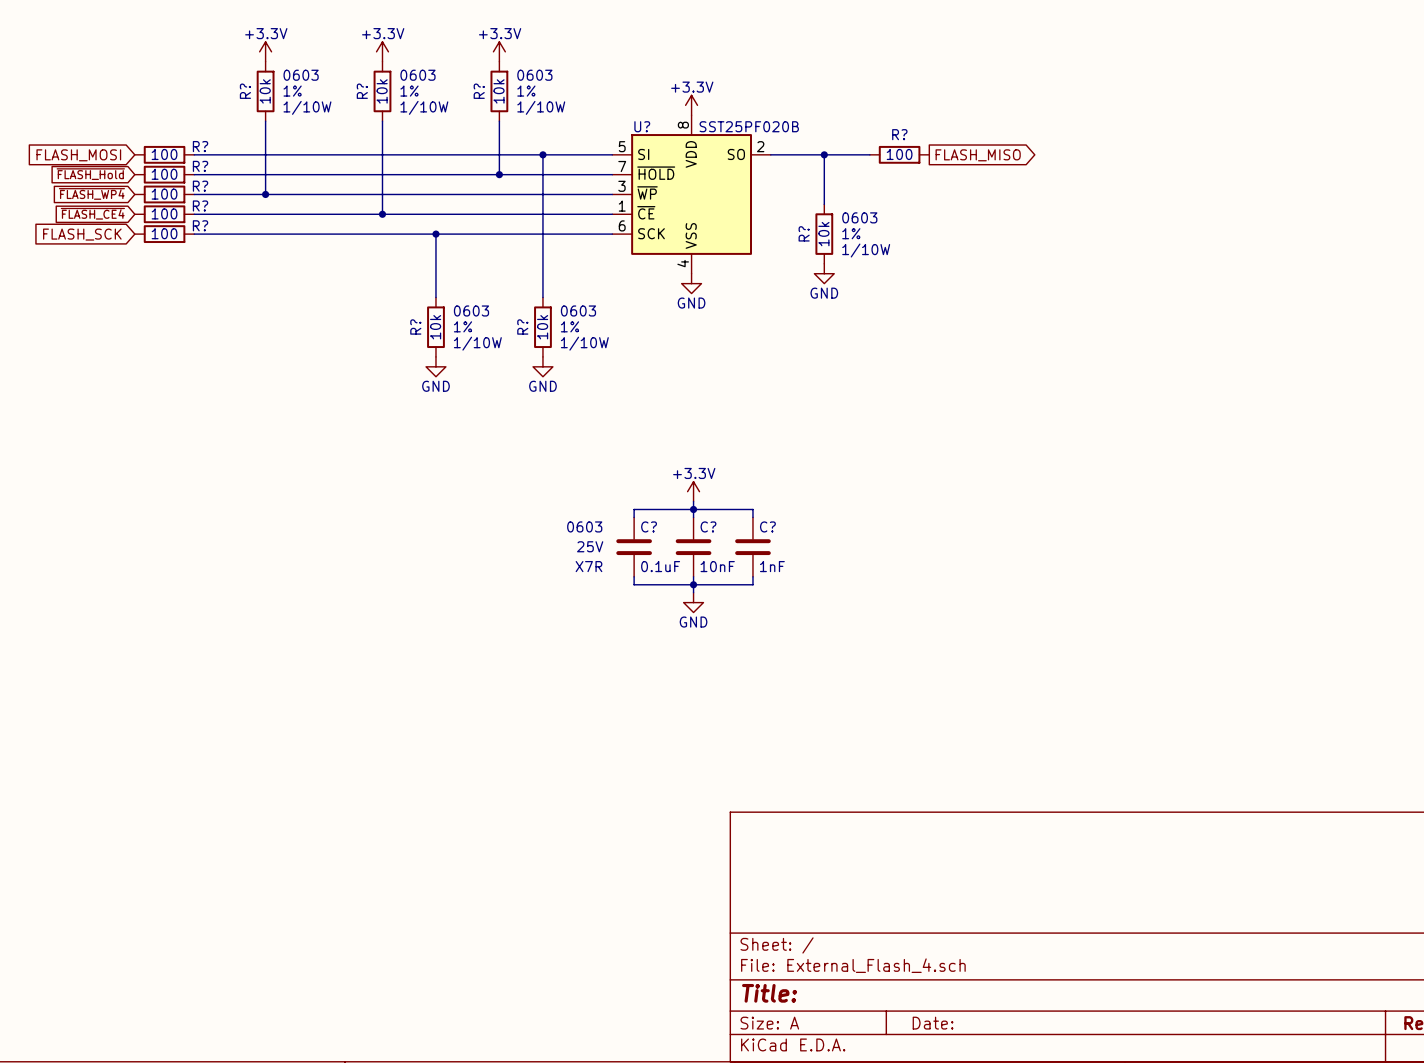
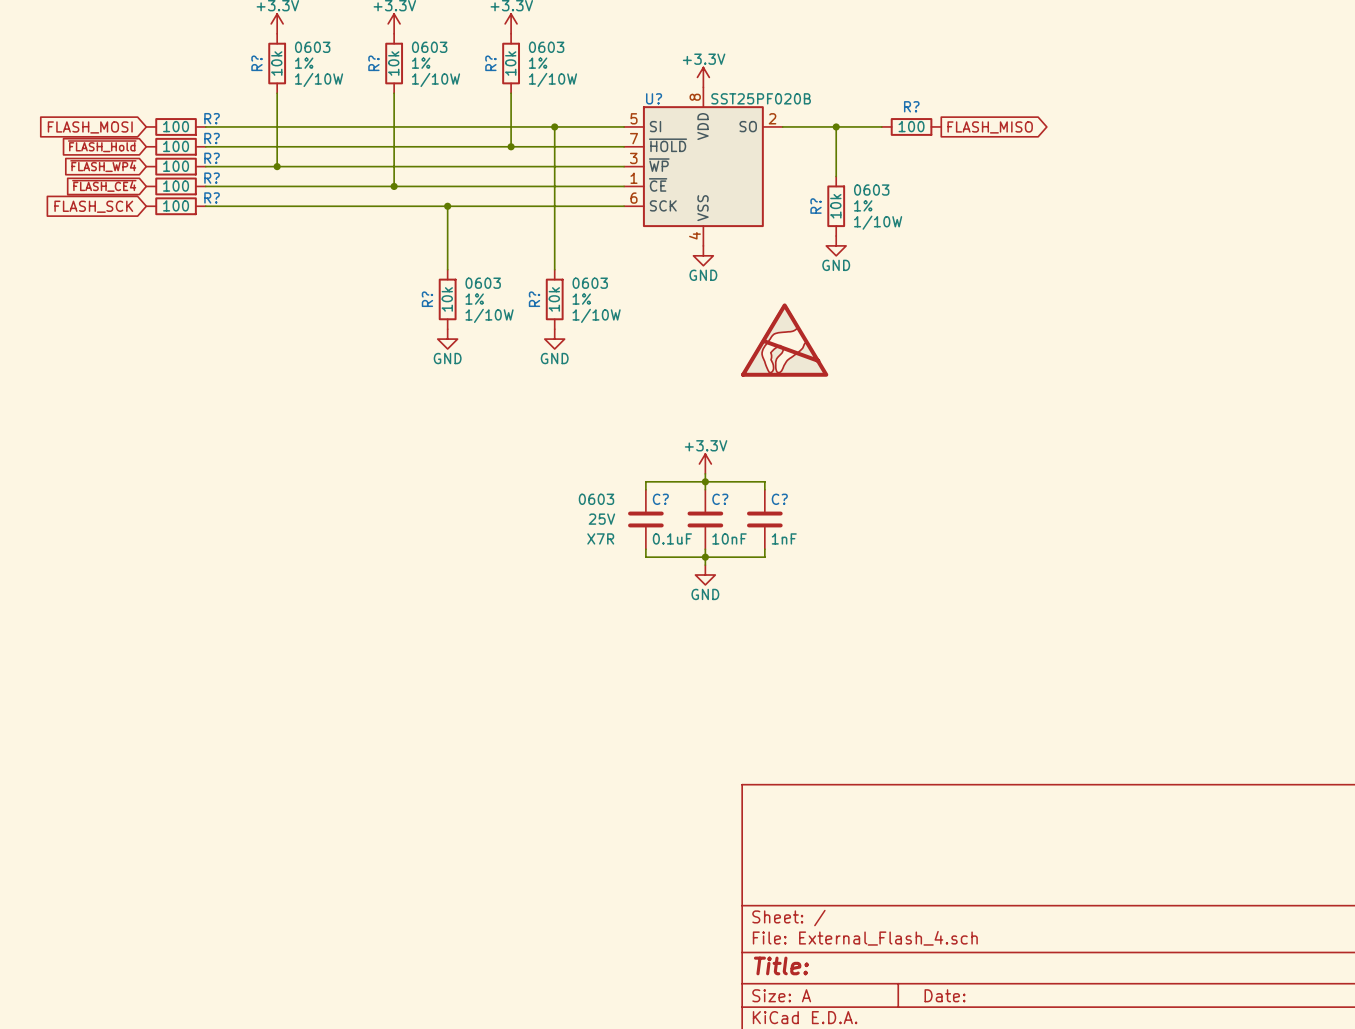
power symbol: none -> (784, 340)

